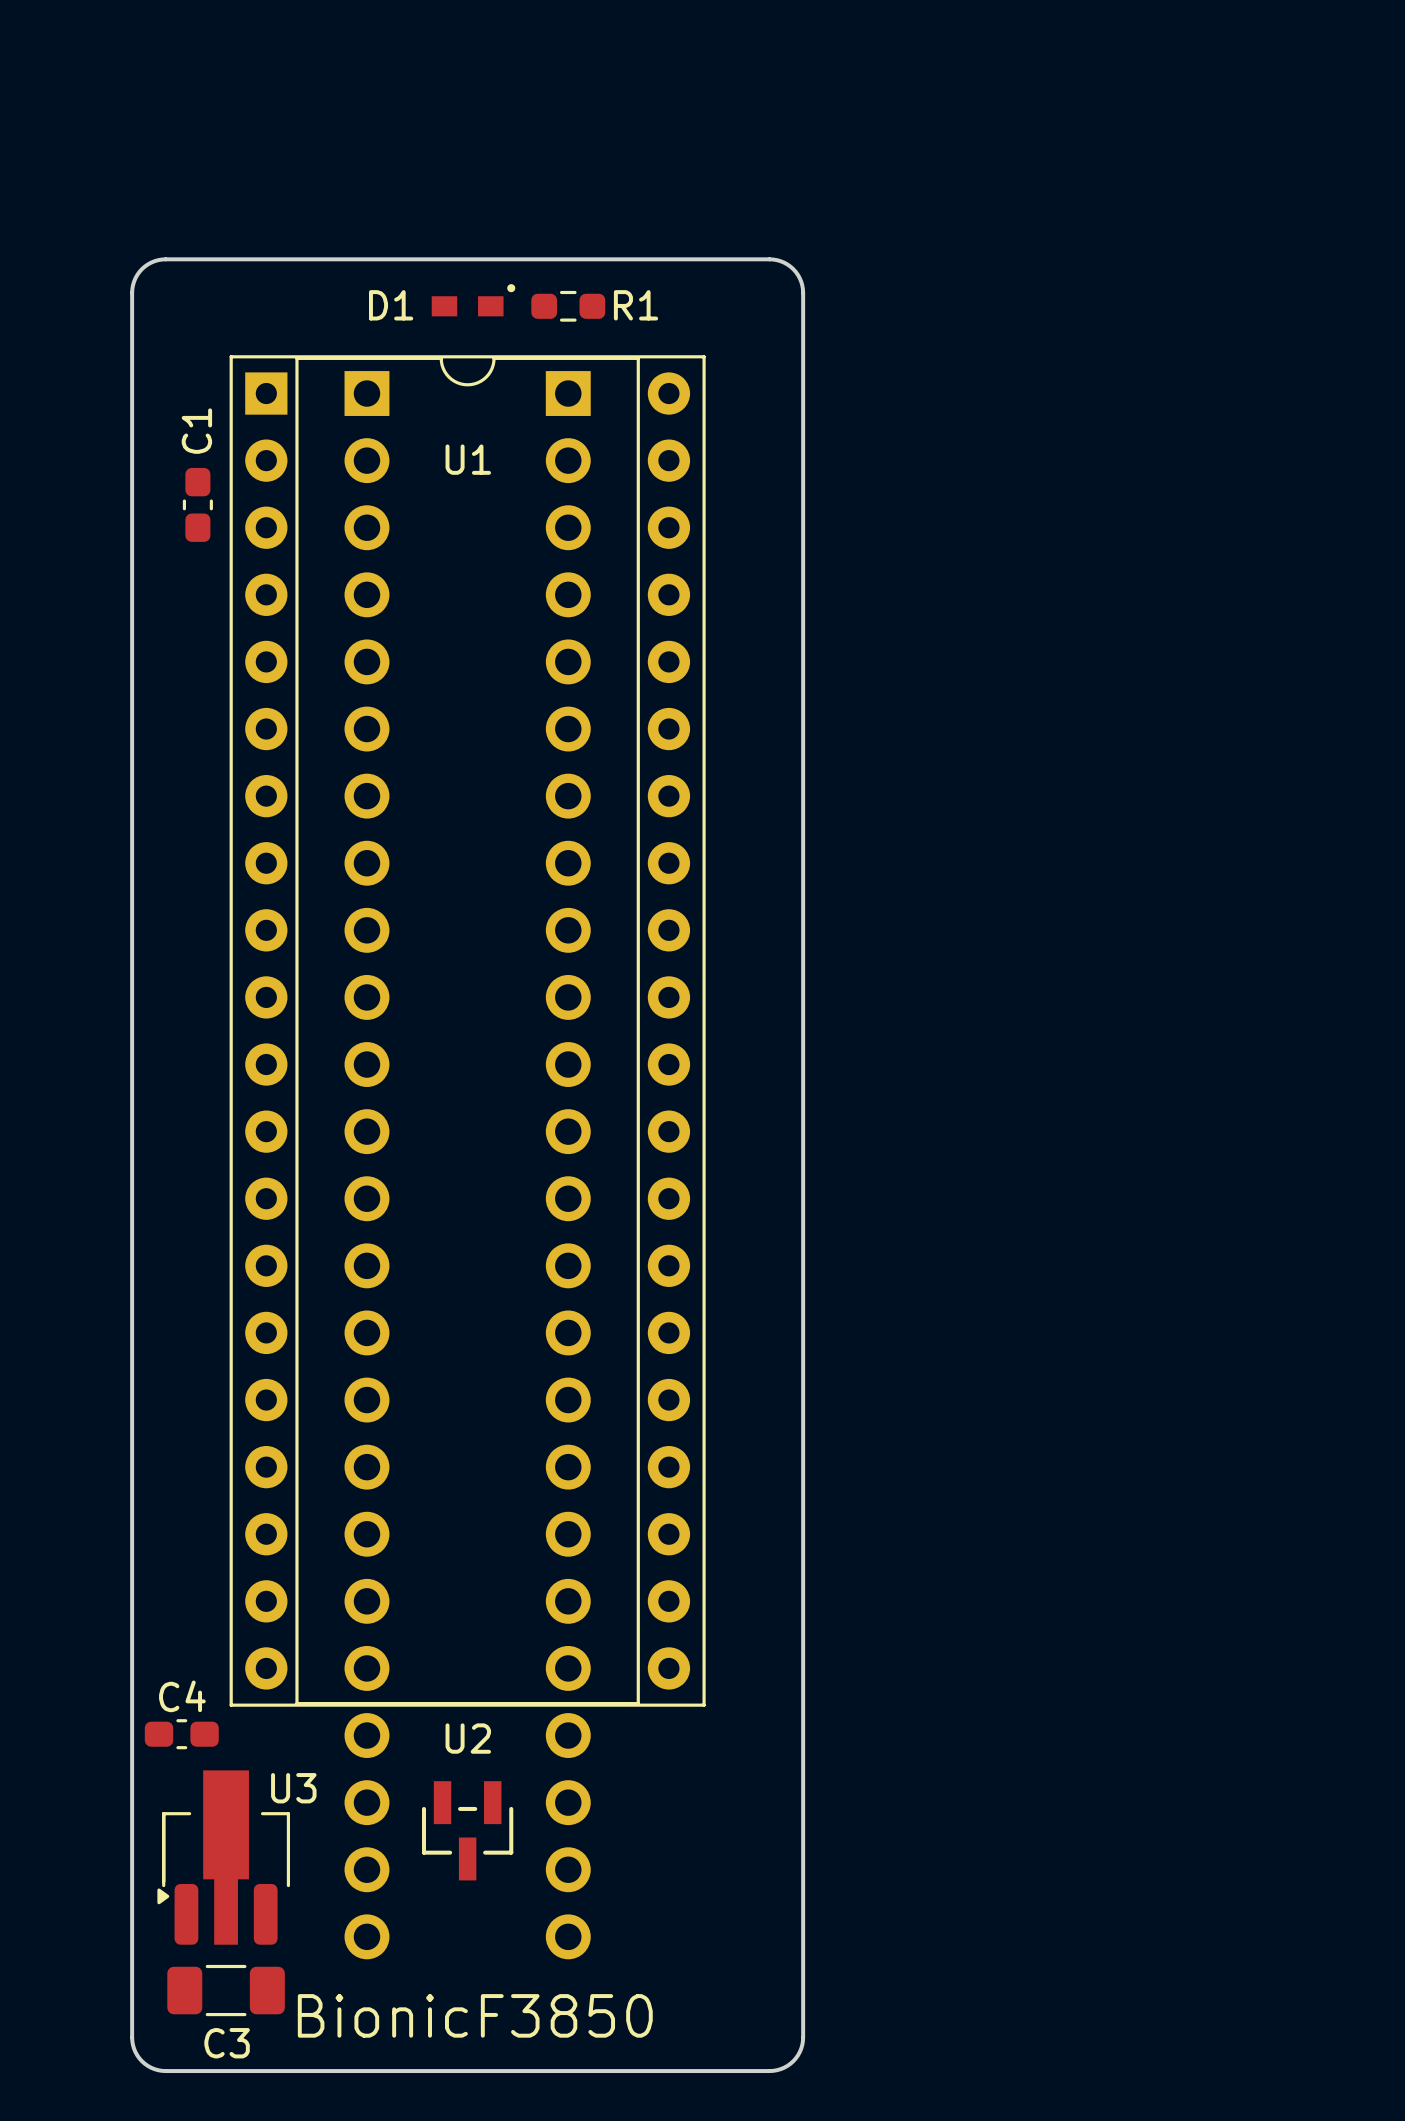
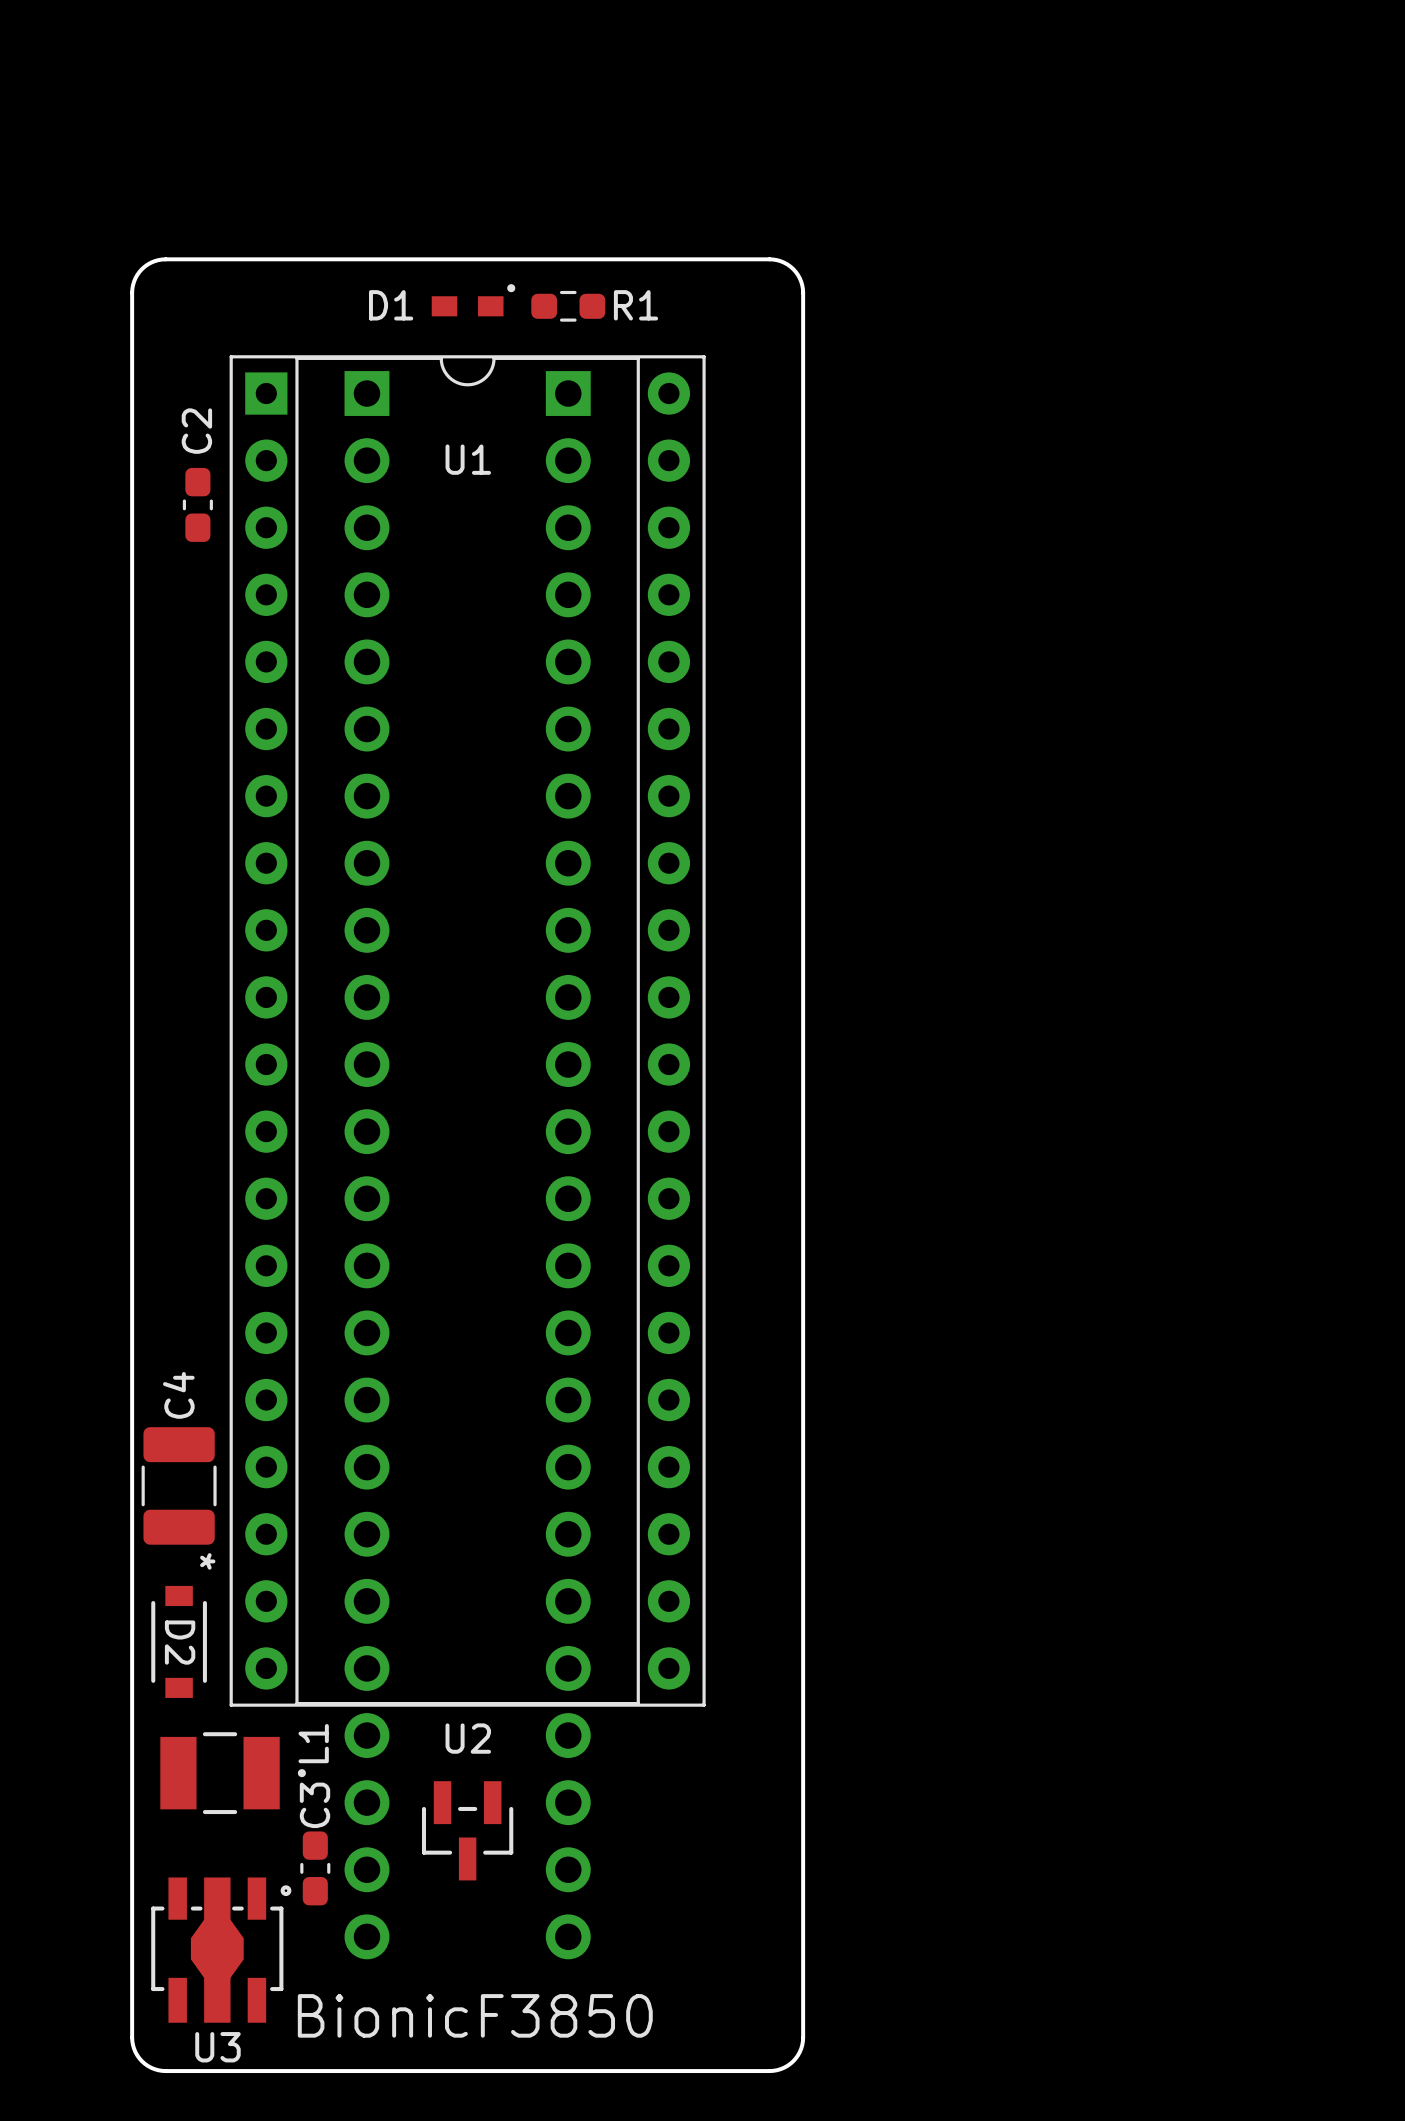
C1 name: C1 (196, 431) -> C2 (196, 431)
D2: none -> (179, 1641)
C4 name position: C4 (182, 1696) -> C4 (178, 1395)
C4 footprint: [144, 1719, 219, 1750] -> [141, 1427, 217, 1545]
U3 footprint: [157, 1770, 291, 1945] -> [151, 1877, 292, 2023]
L1: none -> (233, 1773)
U3 name position: U3 (293, 1788) -> U3 (217, 2047)
C3 footprint: [167, 1964, 285, 2017] -> [300, 1831, 331, 1906]
C3 name position: C3 (227, 2043) -> C3 (315, 1805)

